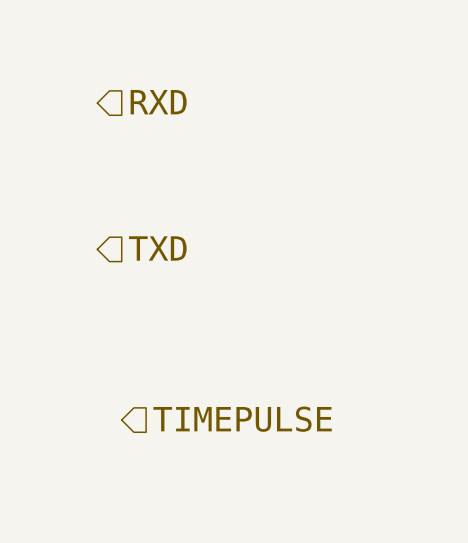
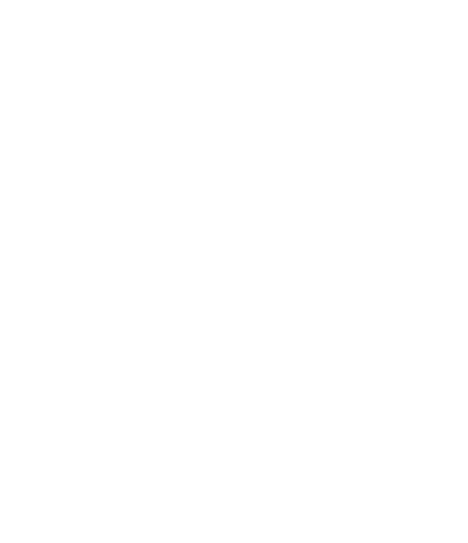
hierarchical label: RXD (158, 102) -> none
hierarchical label: TXD (157, 248) -> none
hierarchical label: TIMEPULSE (242, 419) -> none

